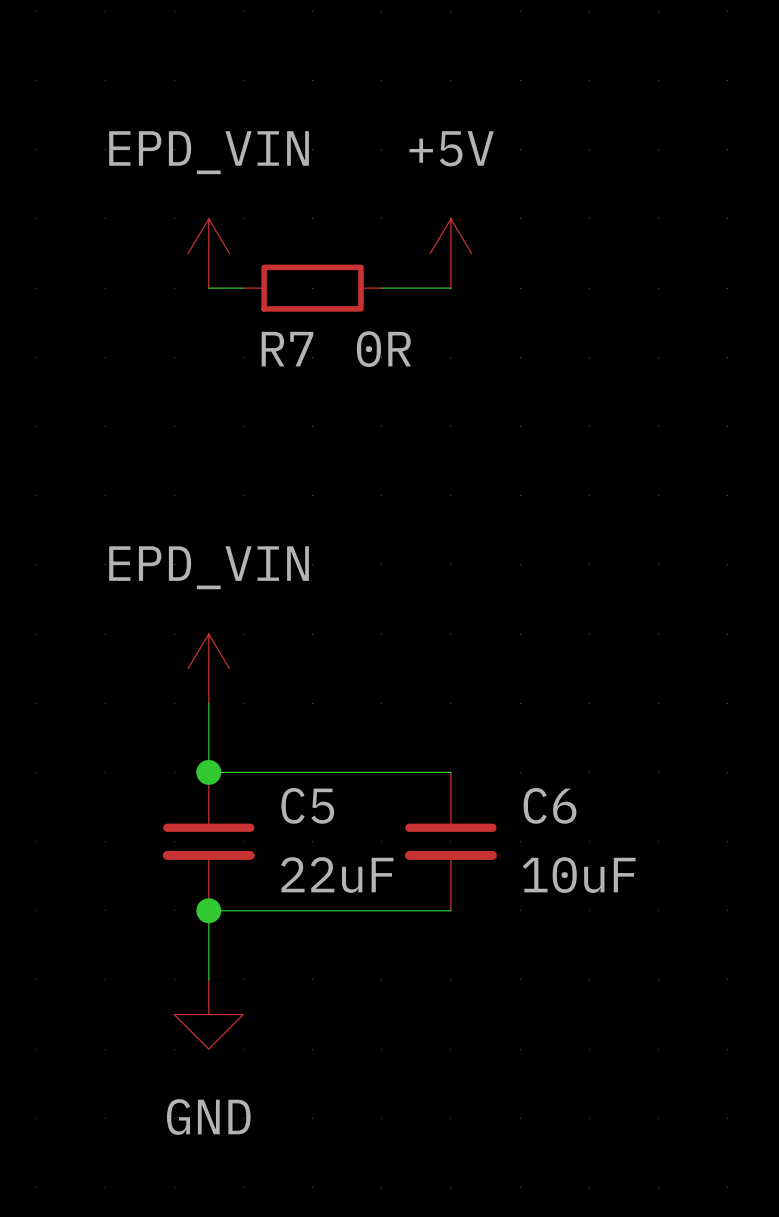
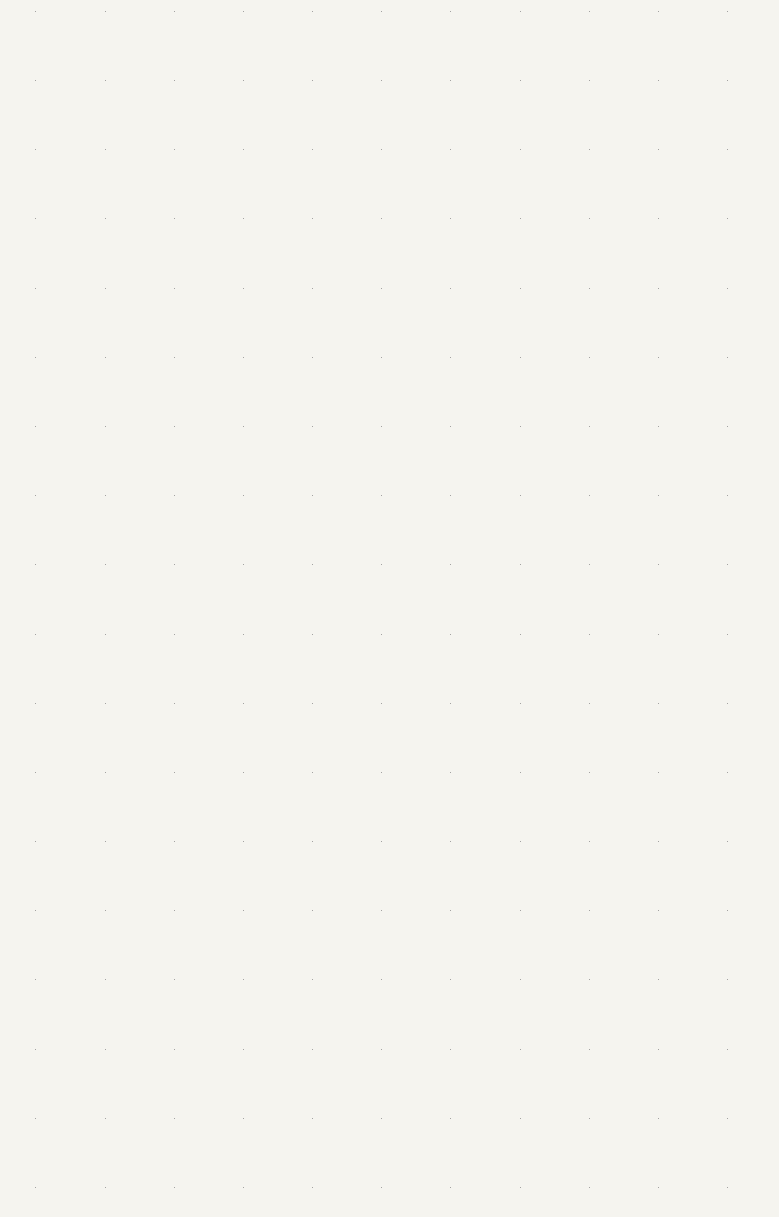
power symbol: EPD_VIN (208, 253) -> none
power symbol: +5V (450, 253) -> none
wire: (208, 288) (243, 288) -> none
R7: 0R (312, 288) -> none
wire: (381, 288) (450, 288) -> none
power symbol: EPD_VIN (208, 668) -> none
wire: (208, 703) (208, 772) (450, 772) -> none
junction: (208, 772) -> none
C5: 22uF (208, 841) -> none
C6: 10uF (450, 841) -> none
junction: (208, 910) -> none
wire: (450, 910) (208, 910) (208, 979) -> none
power symbol: GND (208, 1014) -> none

